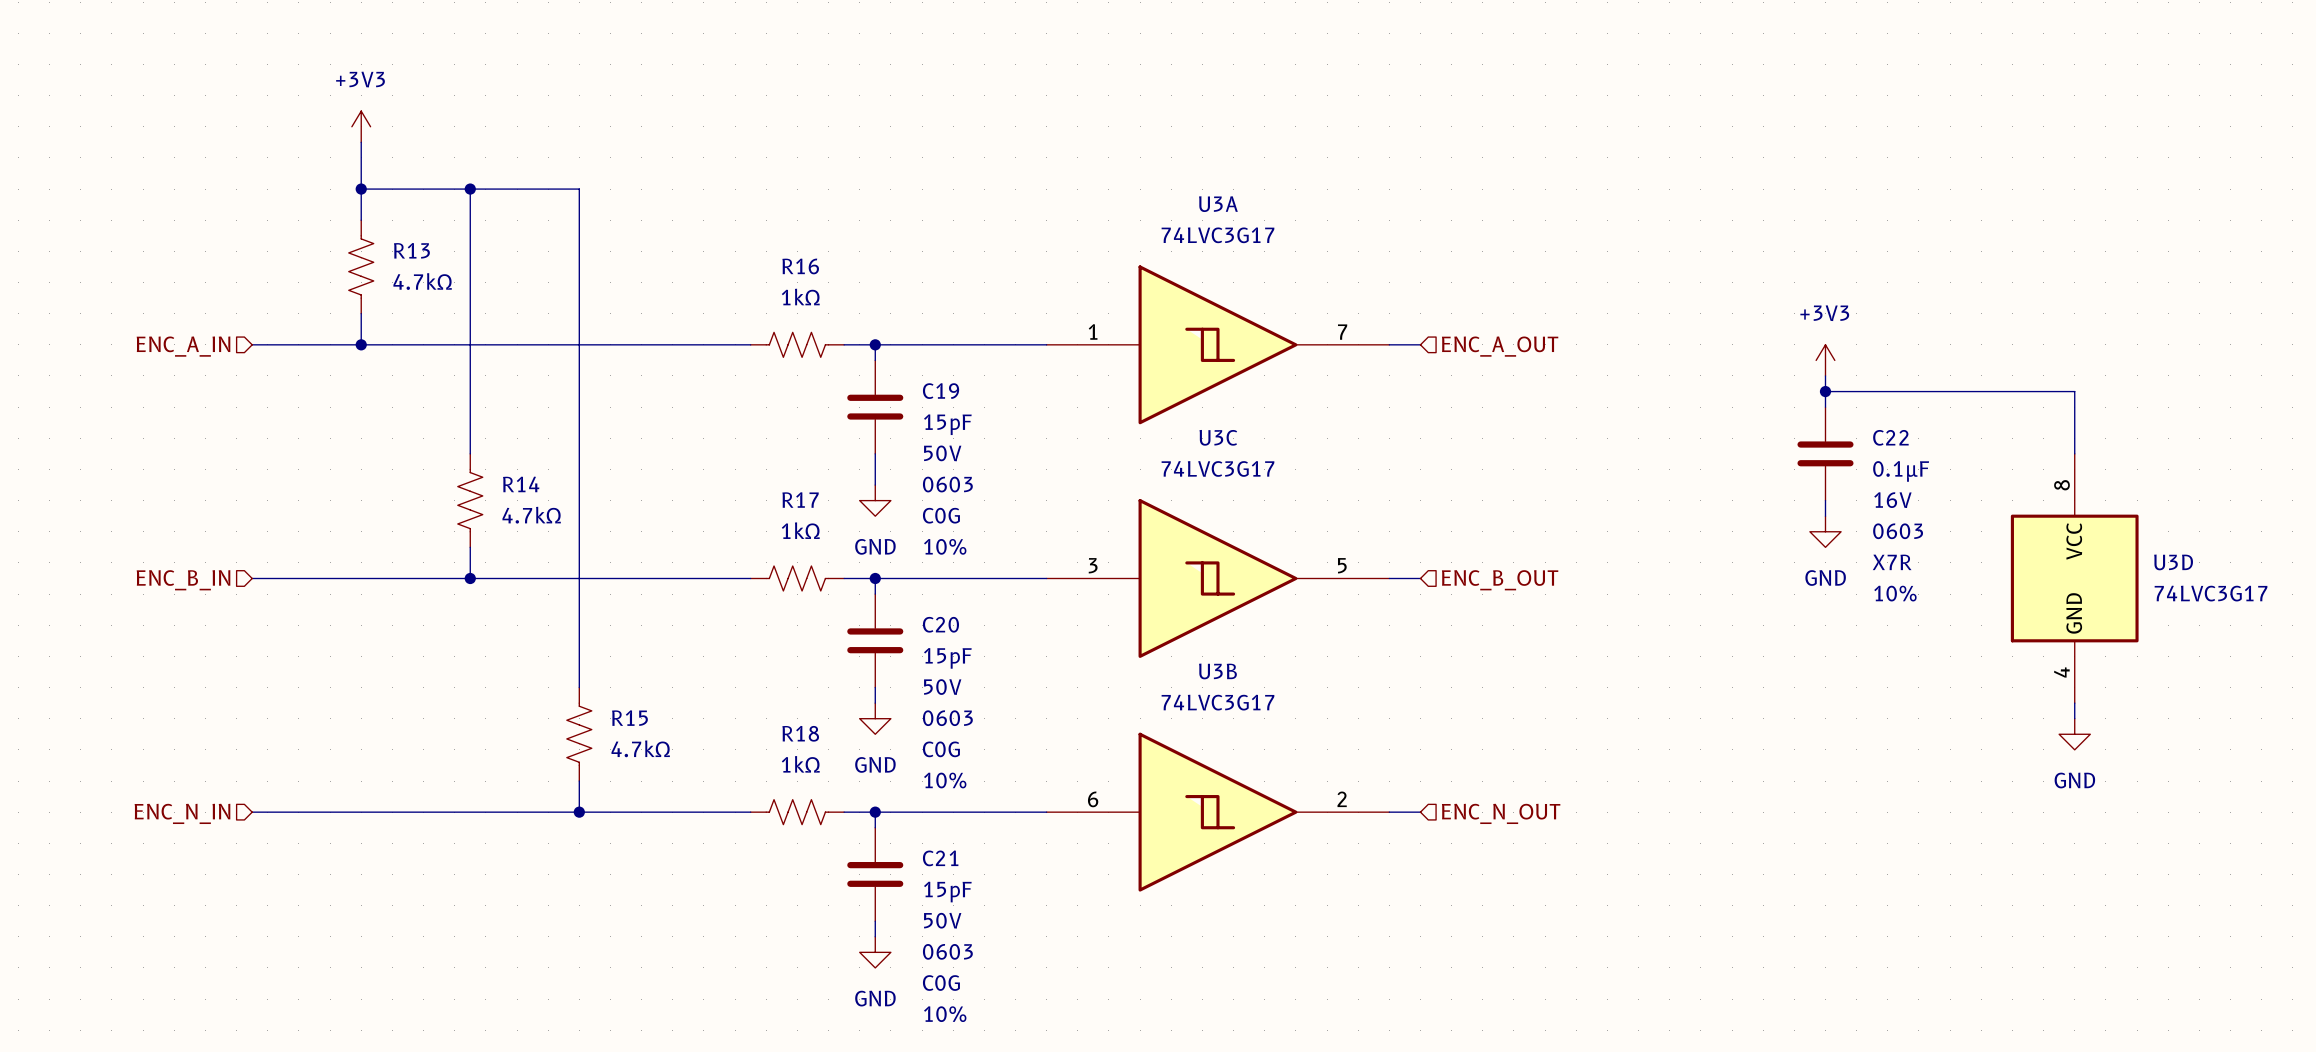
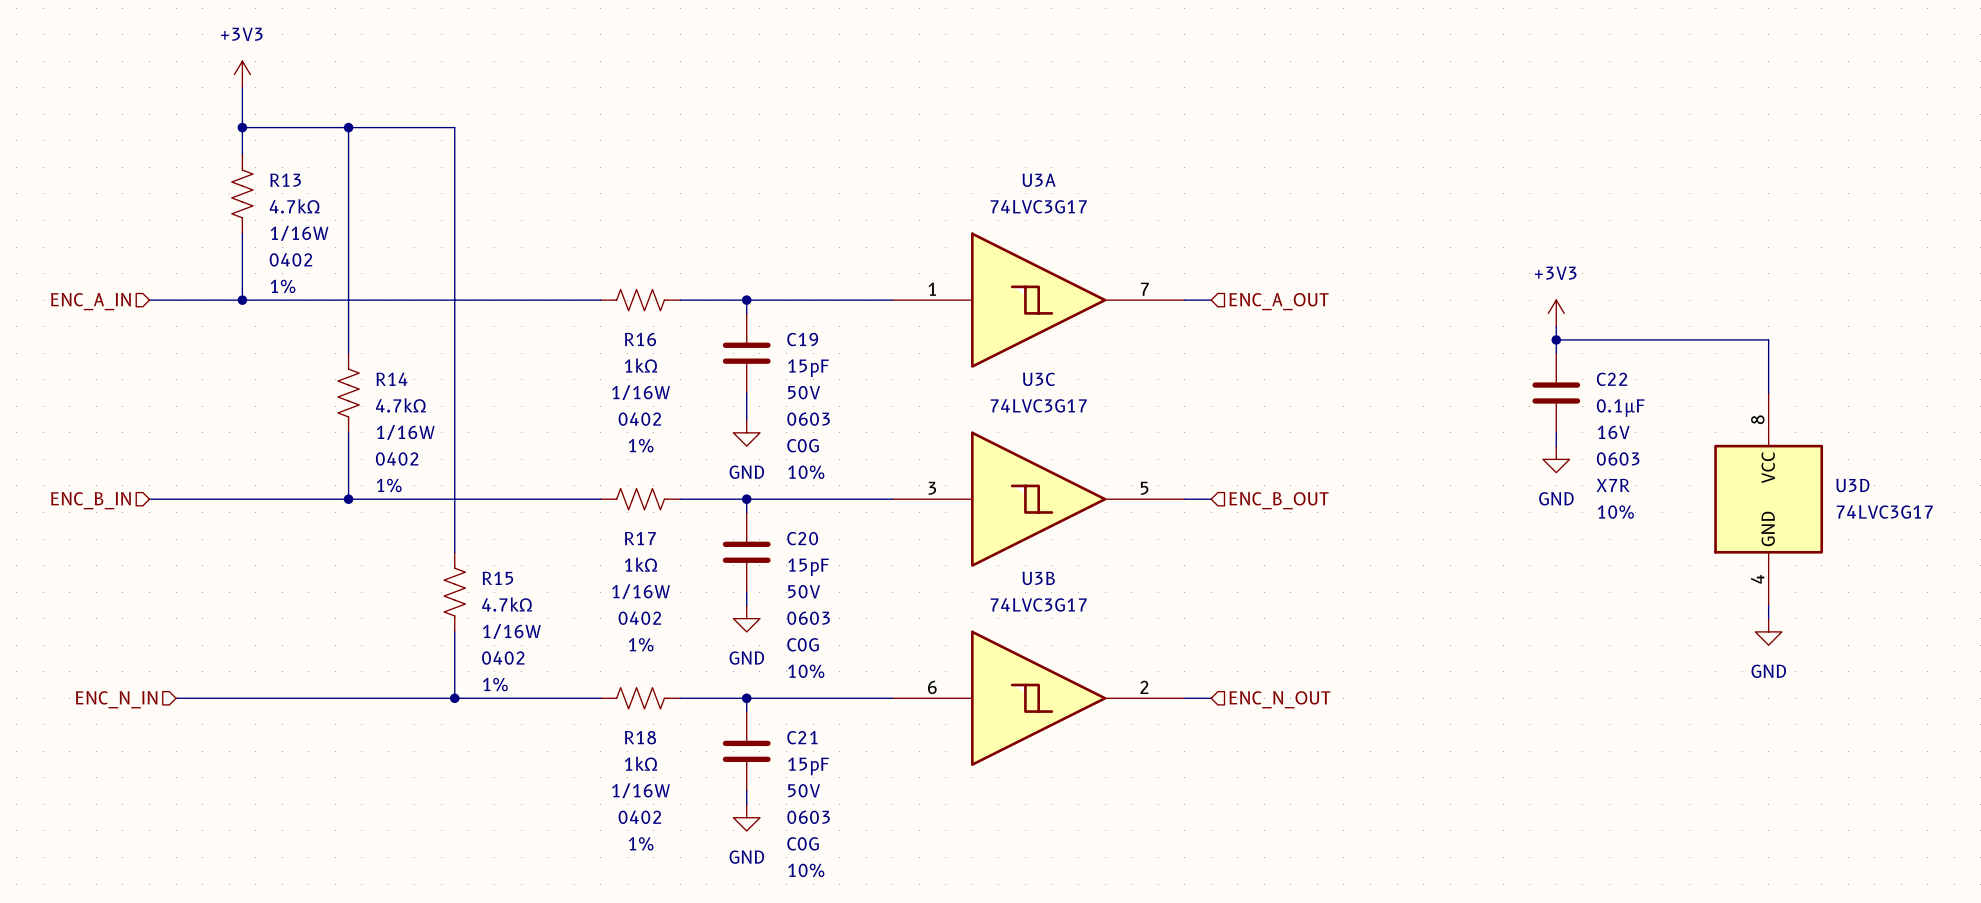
power symbol position: +3V3 (361, 126) -> +3V3 (242, 74)
wire: none -> (242, 127) (454, 127) (454, 552)
junction: none -> (242, 127)
wire: (361, 142) (361, 220) -> (242, 87) (242, 154)
junction: none -> (348, 127)
wire: (361, 189) (579, 189) (579, 687) -> none
junction: (361, 189) -> none
wire: (470, 189) (470, 453) -> (348, 127) (348, 353)
junction: (470, 189) -> none
wire: none -> (242, 233) (242, 300)
R13 text: none -> 1/16W (299, 233)
R13 position: (361, 266) -> (242, 193)
R16 name position: R16 (800, 266) -> R16 (640, 339)
R13 text: none -> 0402 (290, 259)
R16 value position: 1kΩ (800, 297) -> 1kΩ (640, 365)
wire: (361, 313) (361, 344) -> none
R13 text: none -> 1% (283, 286)
wire: none -> (149, 300) (215, 300)
junction: none -> (242, 300)
junction: (361, 344) -> none
R16 position: (797, 344) -> (640, 300)
hierarchical label position: ENC_A_IN (183, 346) -> ENC_A_IN (90, 301)
R16 text: none -> 1/16W (641, 392)
R16 text: none -> 0402 (639, 419)
wire: none -> (348, 432) (348, 499)
R14 position: (470, 500) -> (348, 393)
R14 text: none -> 1/16W (405, 432)
R17 name position: R17 (800, 500) -> R17 (640, 538)
R16 text: none -> 1% (641, 445)
R17 value position: 1kΩ (800, 530) -> 1kΩ (640, 564)
R14 text: none -> 0402 (397, 458)
wire: (470, 547) (470, 578) -> none
R14 text: none -> 1% (389, 485)
wire: none -> (149, 499) (215, 499)
junction position: (470, 578) -> (348, 499)
R17 position: (797, 578) -> (640, 499)
hierarchical label position: ENC_B_IN (183, 580) -> ENC_B_IN (90, 500)
R17 text: none -> 1/16W (641, 591)
R17 text: none -> 0402 (639, 618)
R15 text: none -> 1/16W (511, 631)
R18 name position: R18 (800, 733) -> R18 (640, 737)
wire: none -> (454, 631) (454, 698)
R15 position: (579, 734) -> (454, 592)
R17 text: none -> 1% (641, 644)
R15 text: none -> 0402 (503, 658)
R18 value position: 1kΩ (800, 764) -> 1kΩ (640, 763)
wire: (579, 781) (579, 812) -> none
R15 text: none -> 1% (495, 684)
wire: none -> (176, 698) (215, 698)
junction position: (579, 812) -> (454, 698)
R18 position: (797, 812) -> (640, 698)
hierarchical label position: ENC_N_IN (182, 813) -> ENC_N_IN (116, 699)
R18 text: none -> 1/16W (641, 790)
R18 text: none -> 0402 (639, 817)
R18 text: none -> 1% (641, 843)

